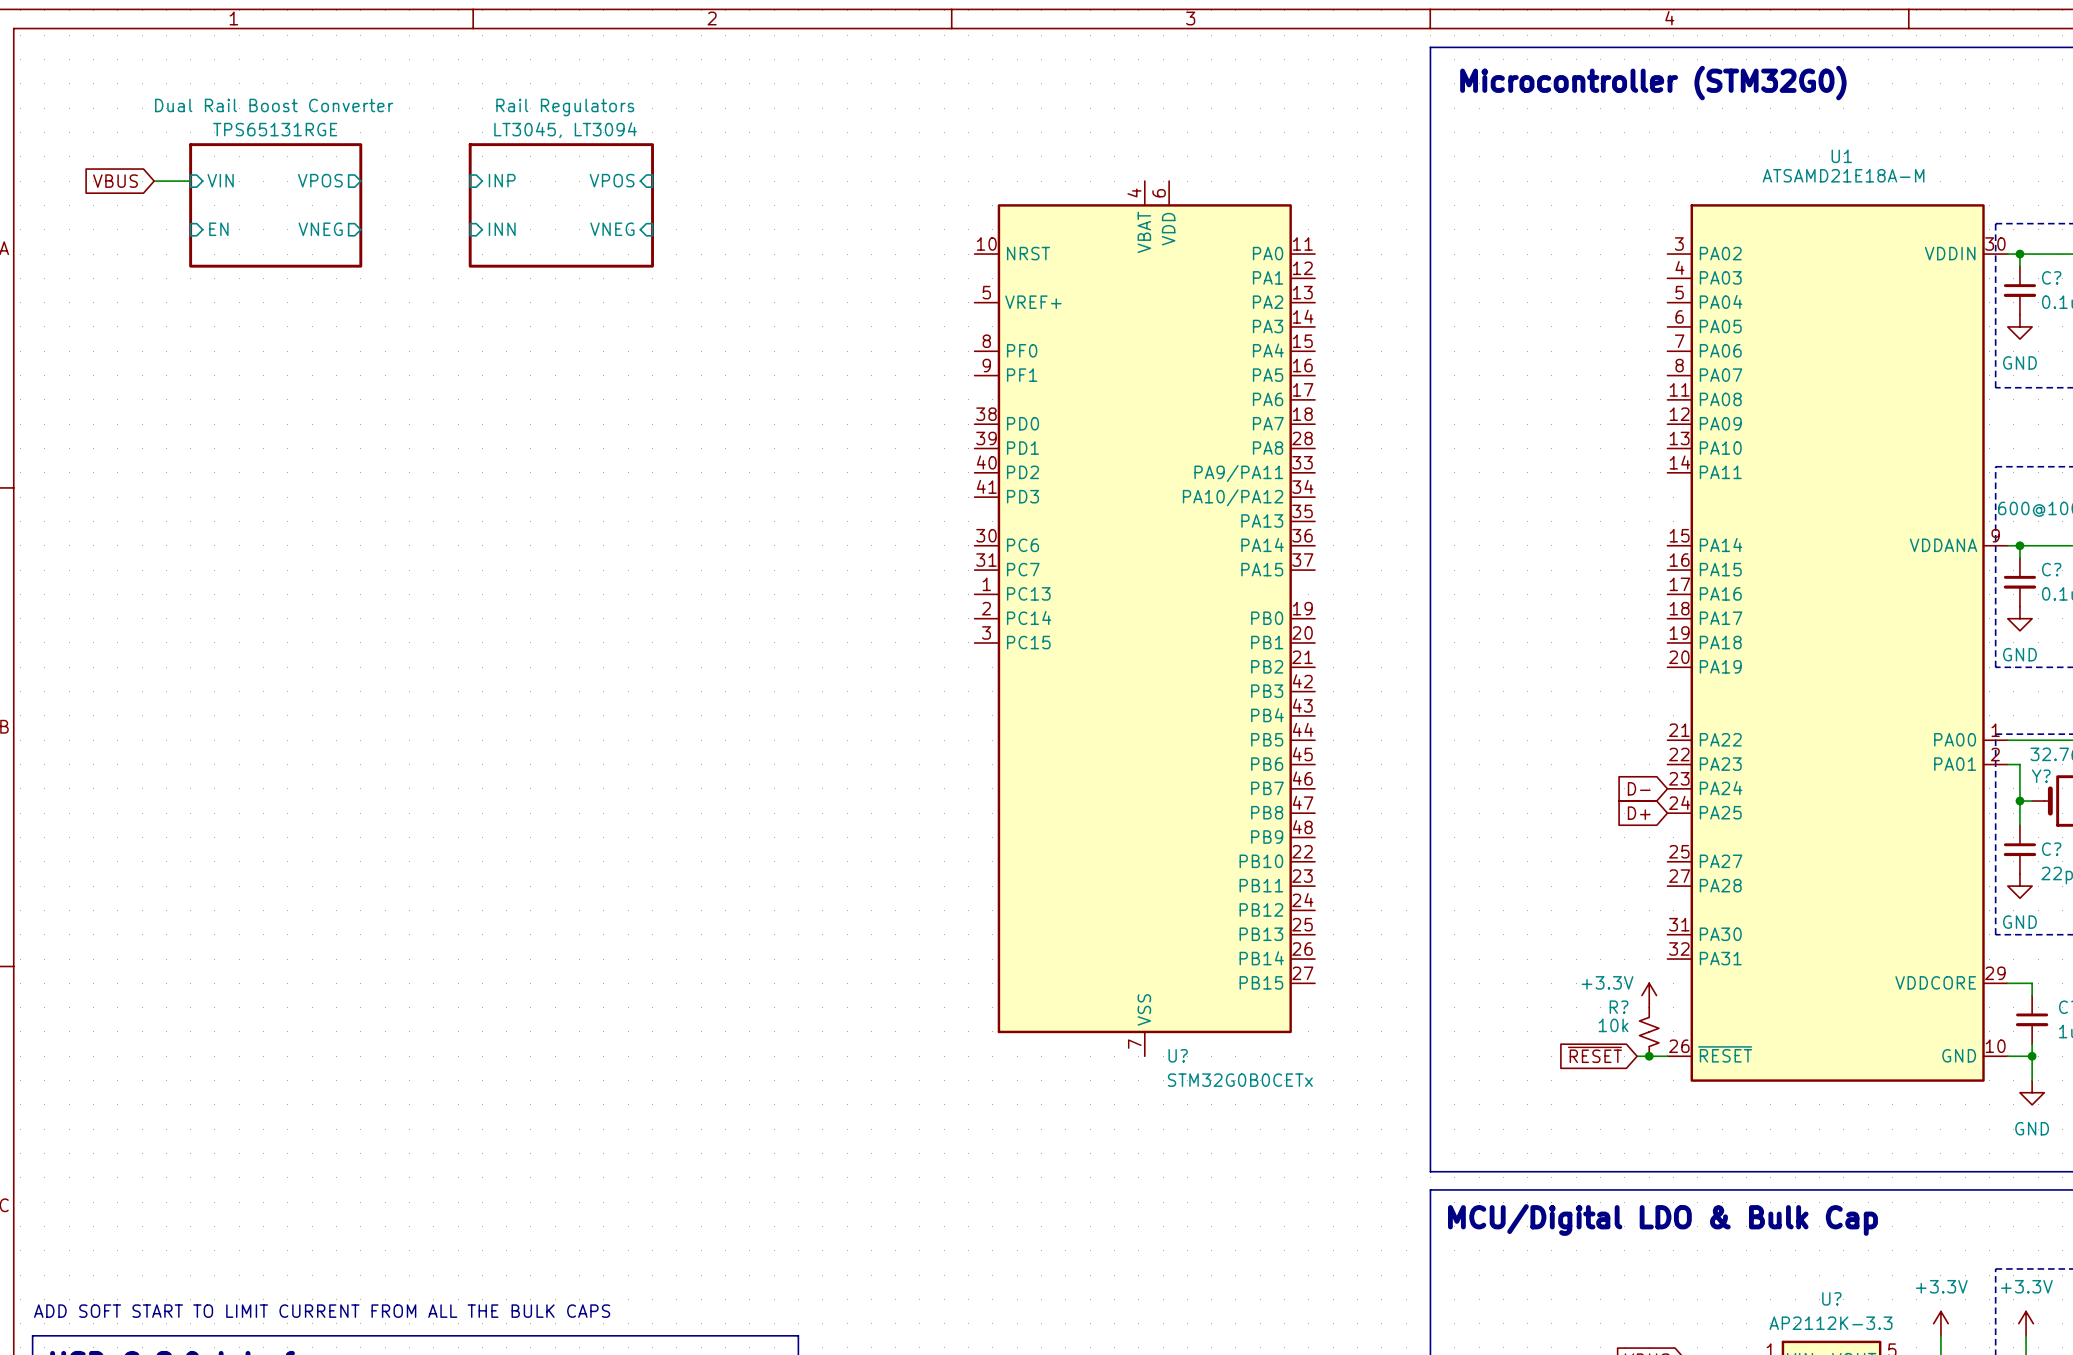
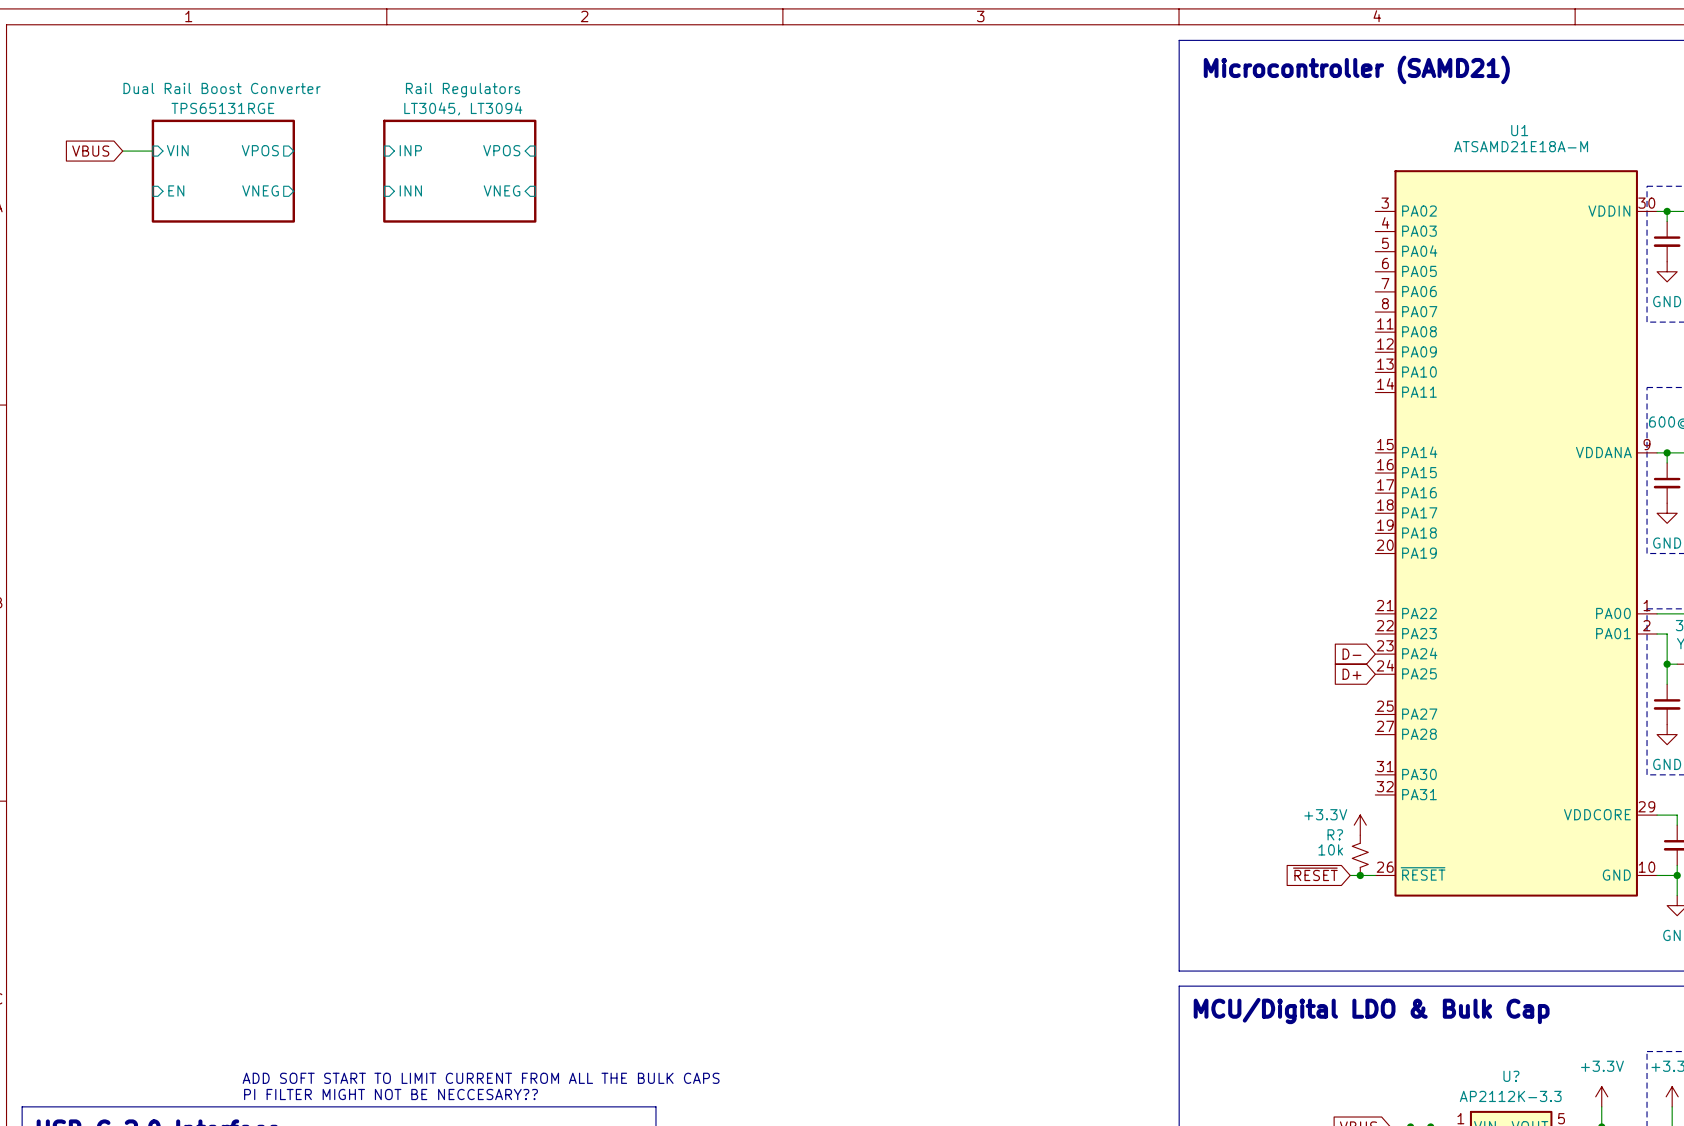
text: Microcontroller (STM32G0) (1653, 83) -> Microcontroller (SAMD21) (1356, 69)
U?: STM32G0B0CETx (1144, 618) -> none
text: none -> ADD SOFT START TO LIMIT CURRENT FROM ALL THE BULK CAPS (481, 1078)
text: ADD SOFT START TO LIMIT CURRENT FROM ALL THE BULK CAPS (322, 1311) -> none
text: none -> PI FILTER MIGHT NOT BE NECCESARY?? (391, 1094)

